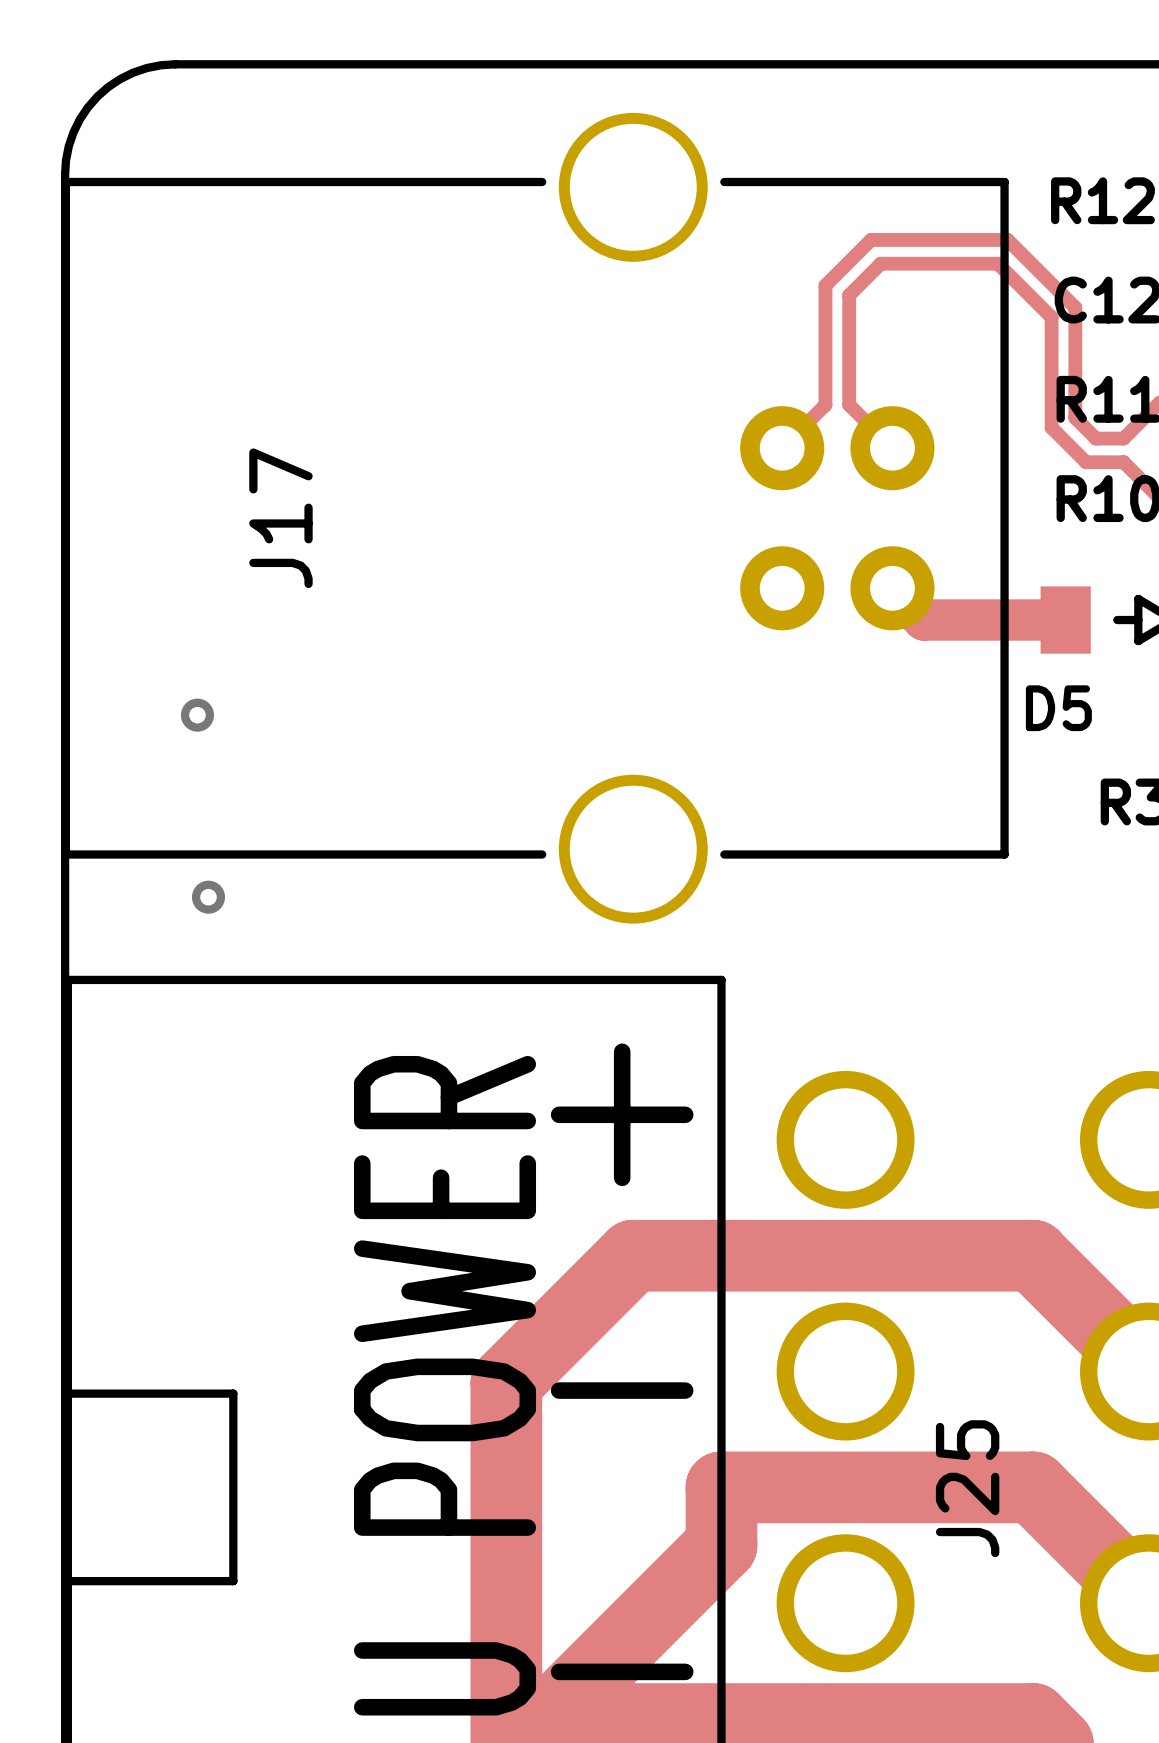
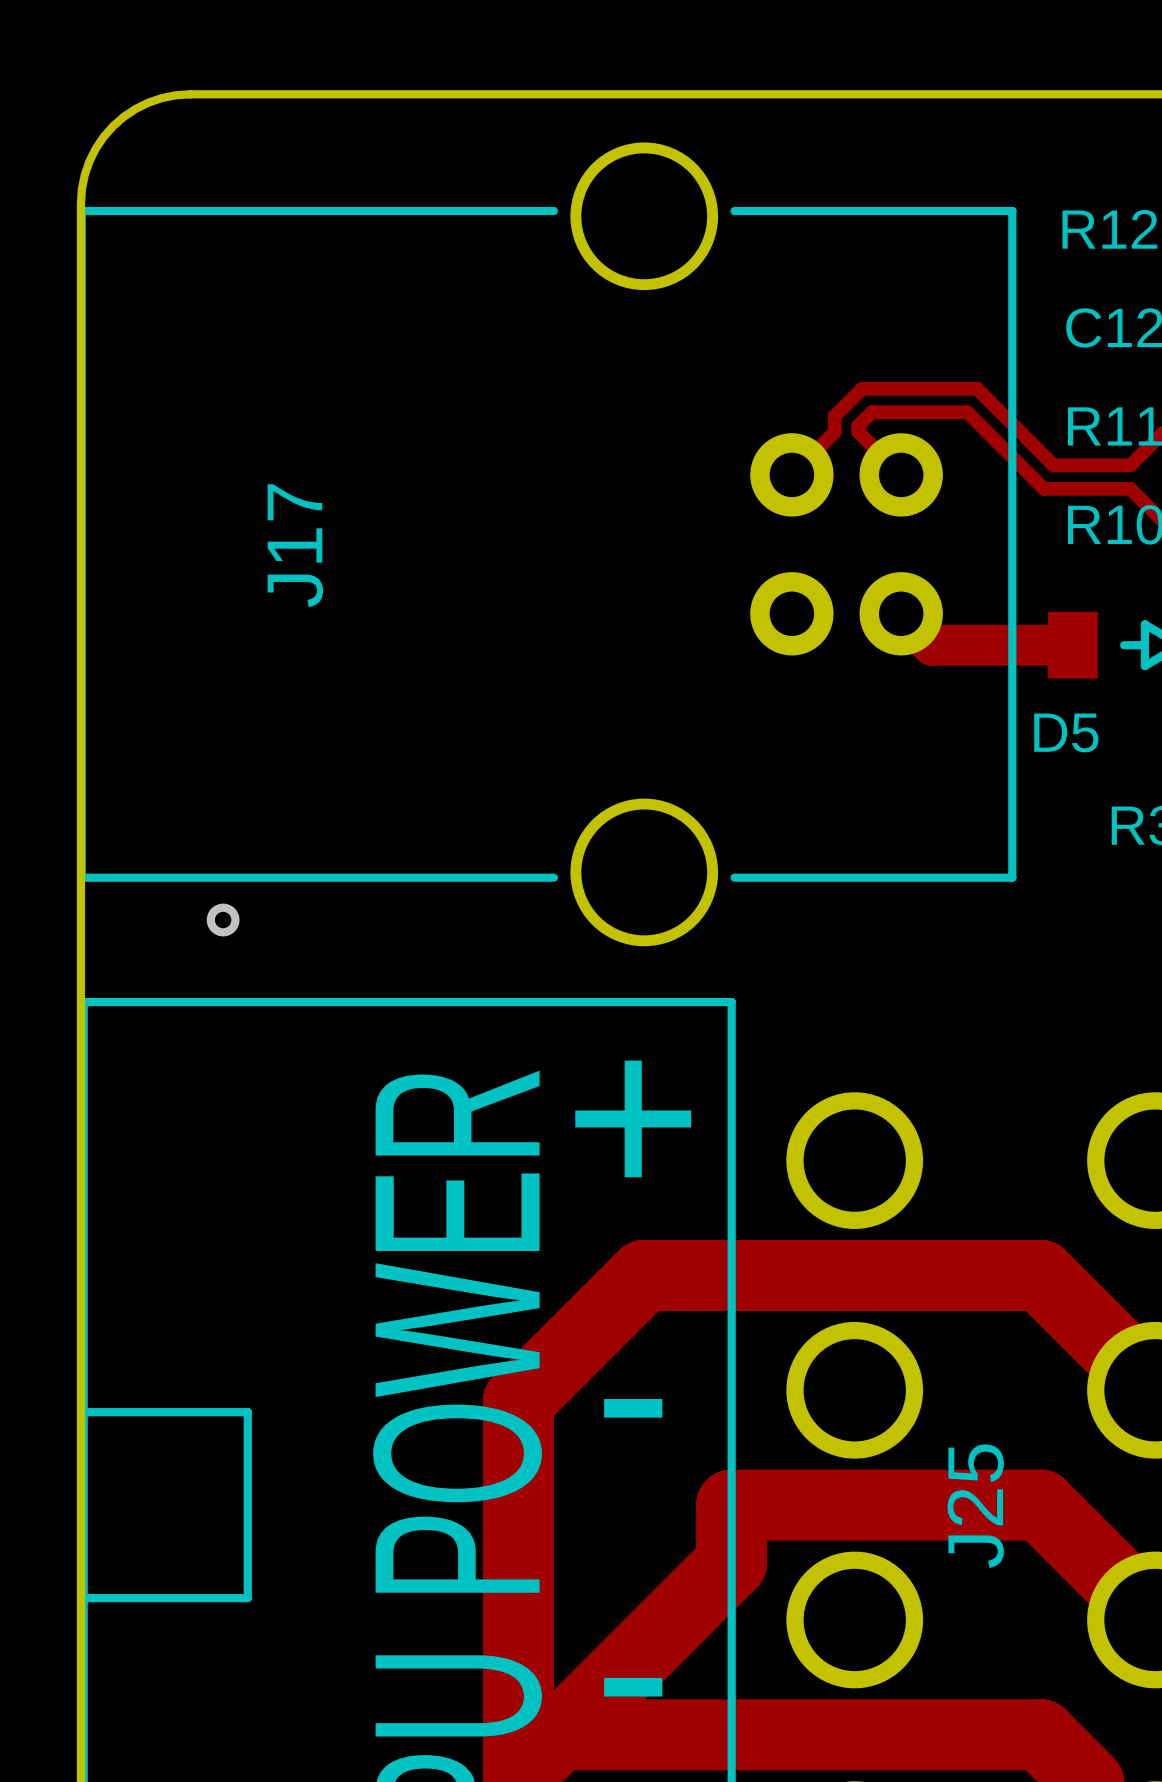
track: (825, 388) (825, 285) (871, 239) (1007, 239) (1075, 307) (1075, 417) (1095, 438) -> (834, 416) (862, 388) (977, 388) (1053, 465) (1102, 465)
track: (849, 398) (849, 295) (880, 263) (997, 263) (1051, 317) (1051, 427) (1086, 462) -> (858, 425) (871, 412) (967, 412) (1043, 488) (1093, 488)
via: (197, 715) -> none

